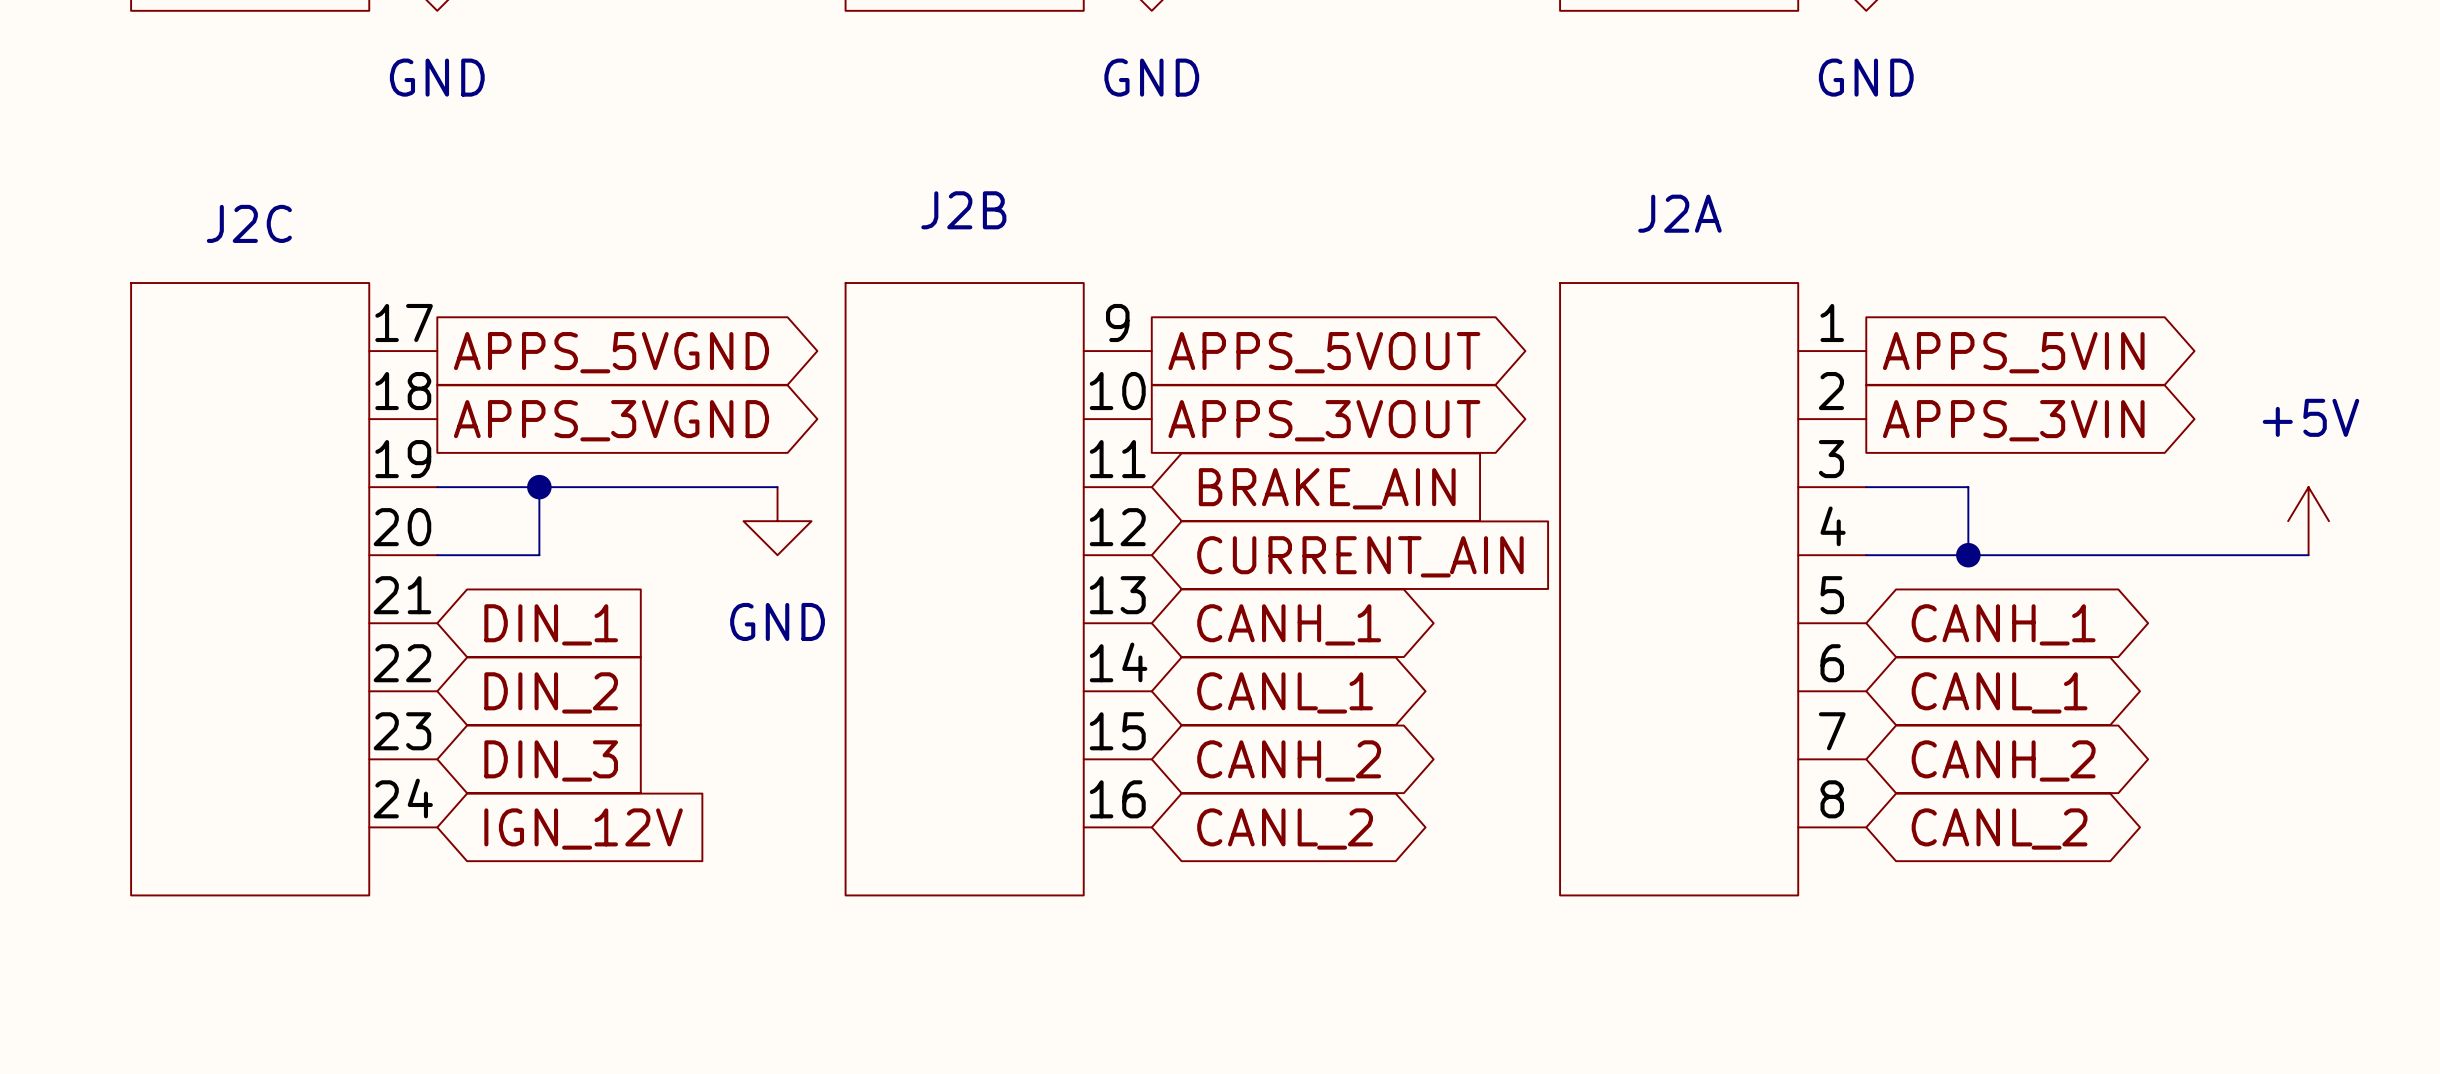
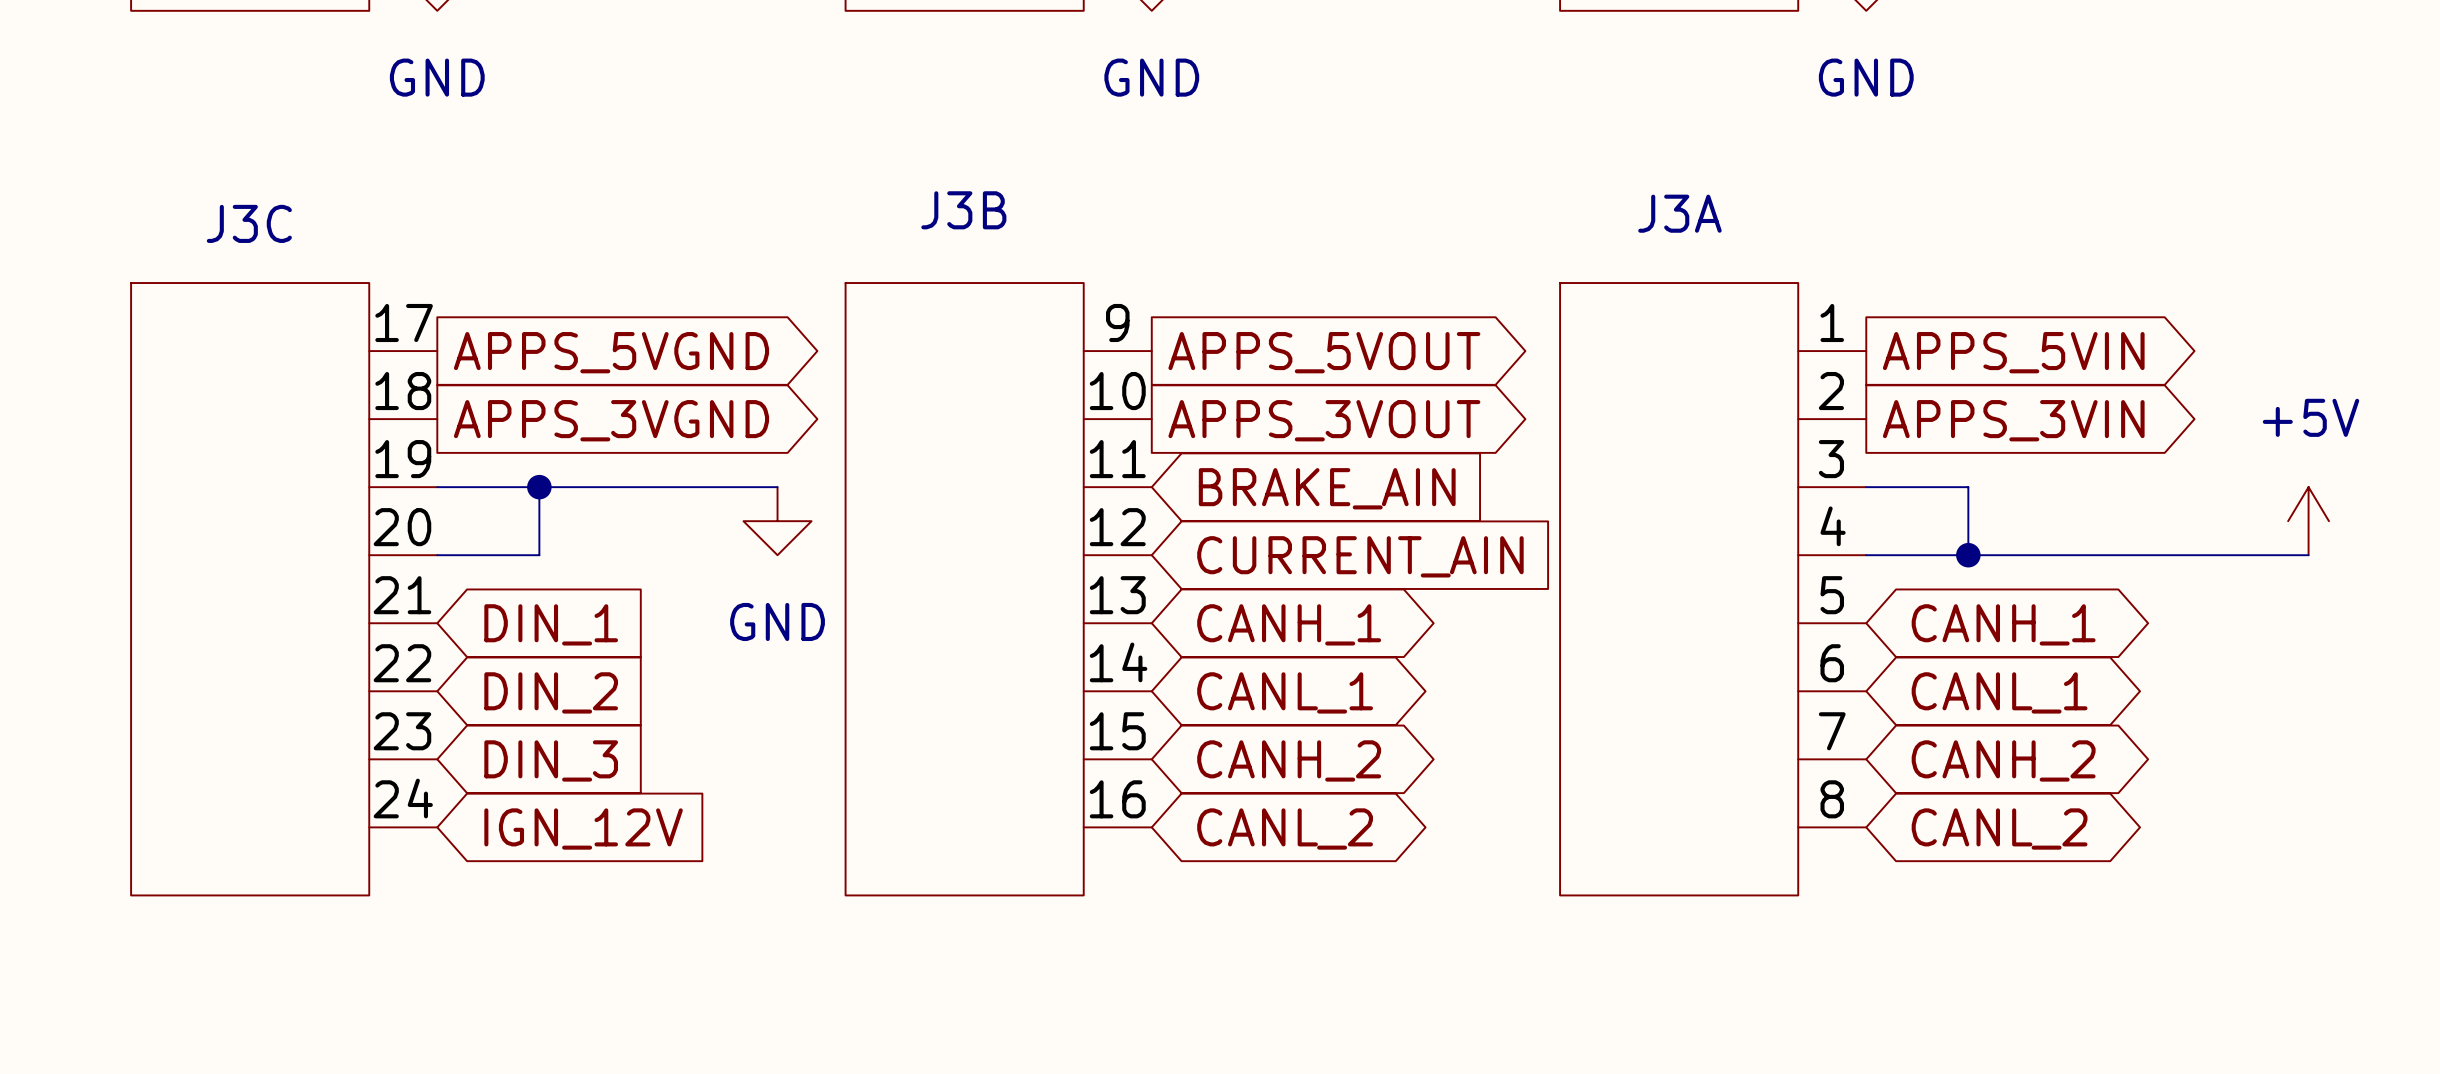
J2B name: J2B (963, 210) -> J3B (963, 210)
J2A name: J2A (1679, 213) -> J3A (1679, 213)
J2C name: J2C (249, 223) -> J3C (249, 223)

